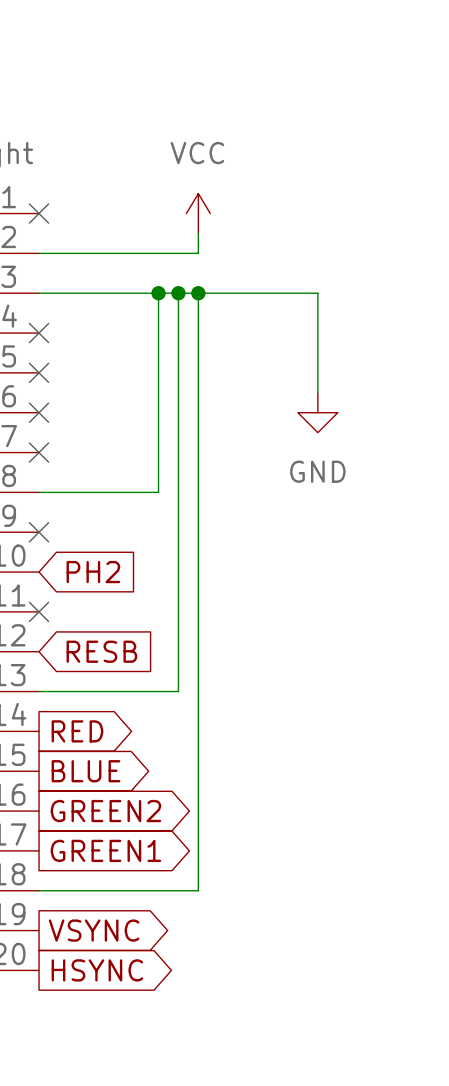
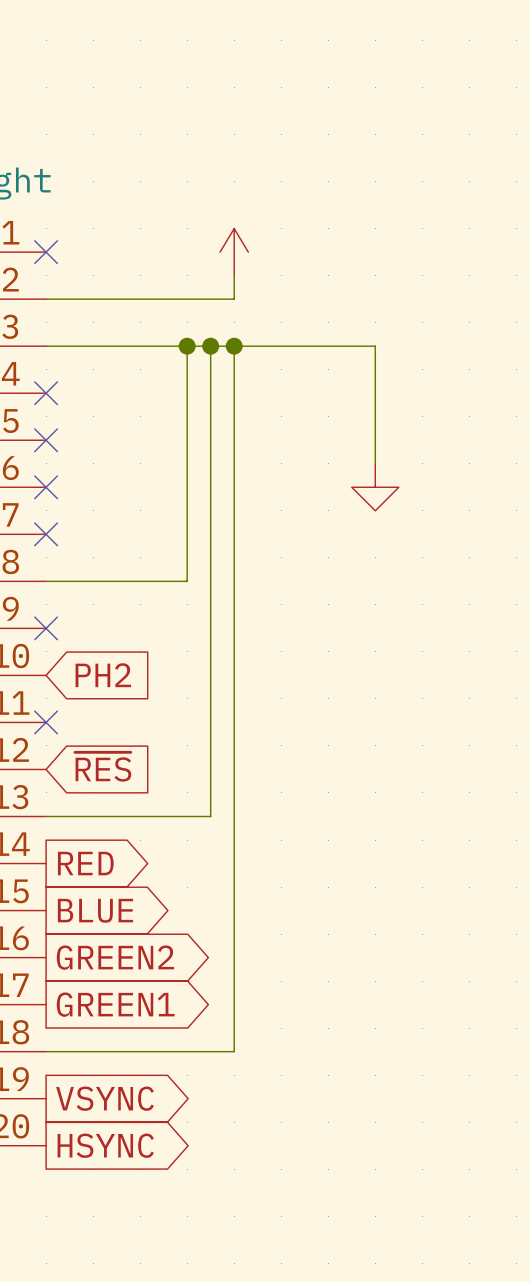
power symbol text: VCC (197, 153) -> none
power symbol text: GND (317, 471) -> none
global label: RESB (101, 651) -> ~{RES} (103, 766)

